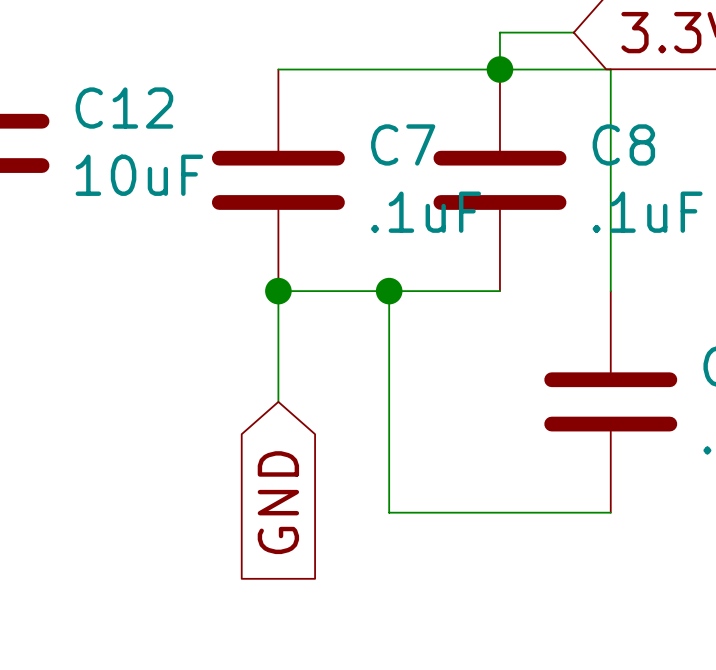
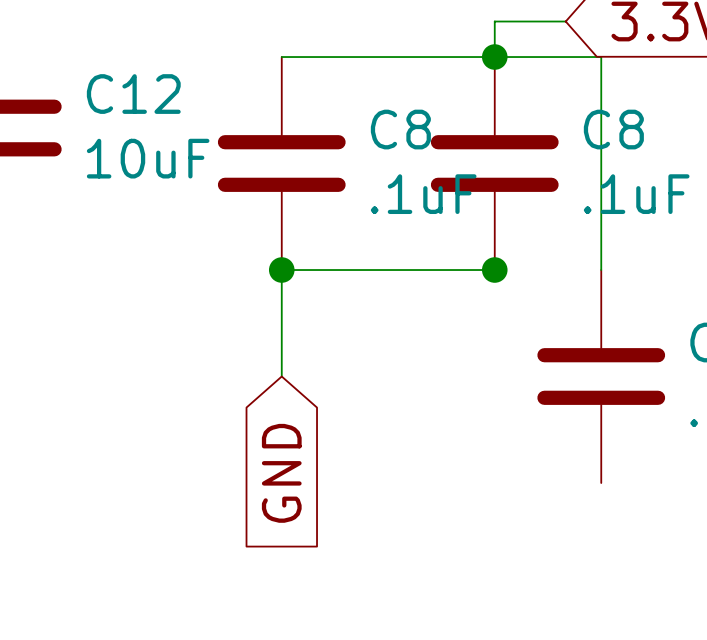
C7 name: C7 (403, 144) -> C8 (400, 129)
wire: (389, 291) (389, 512) (610, 512) -> none
junction position: (389, 291) -> (494, 270)

